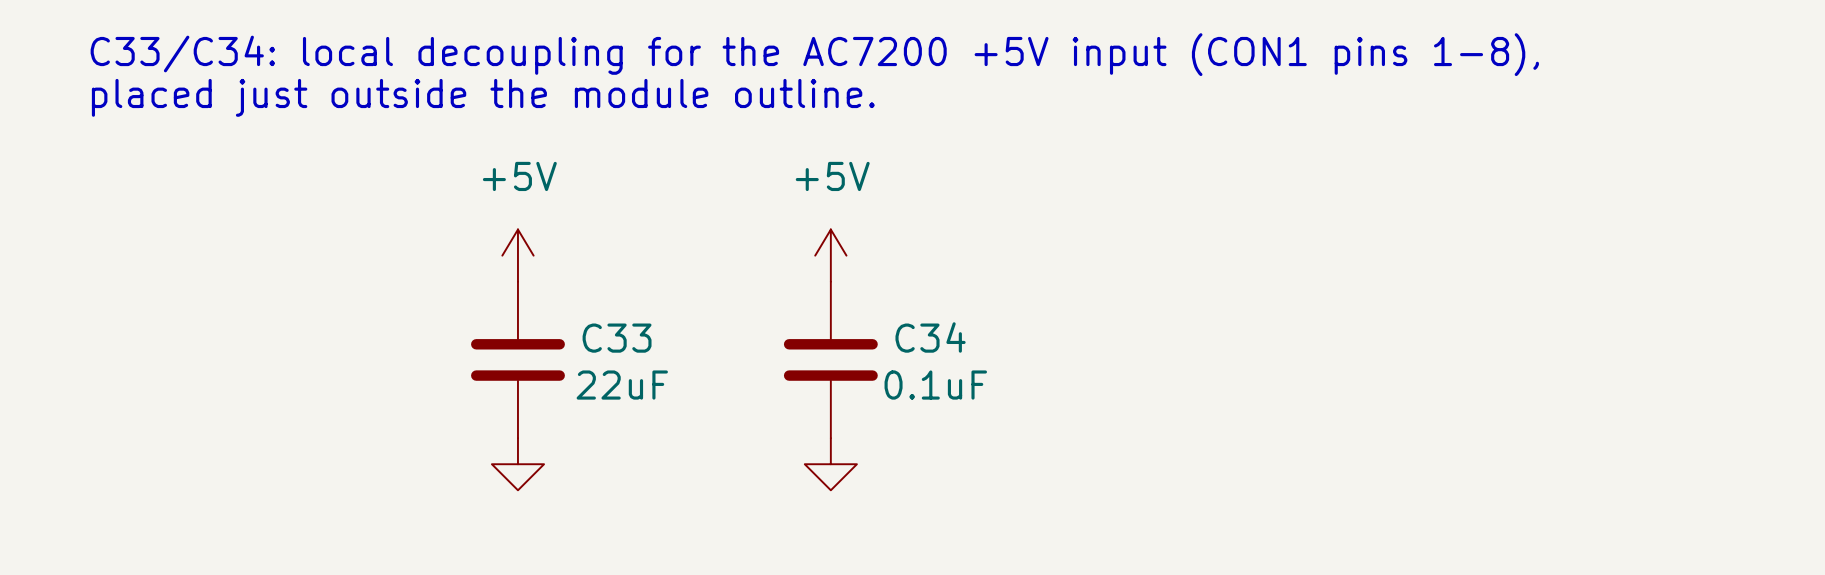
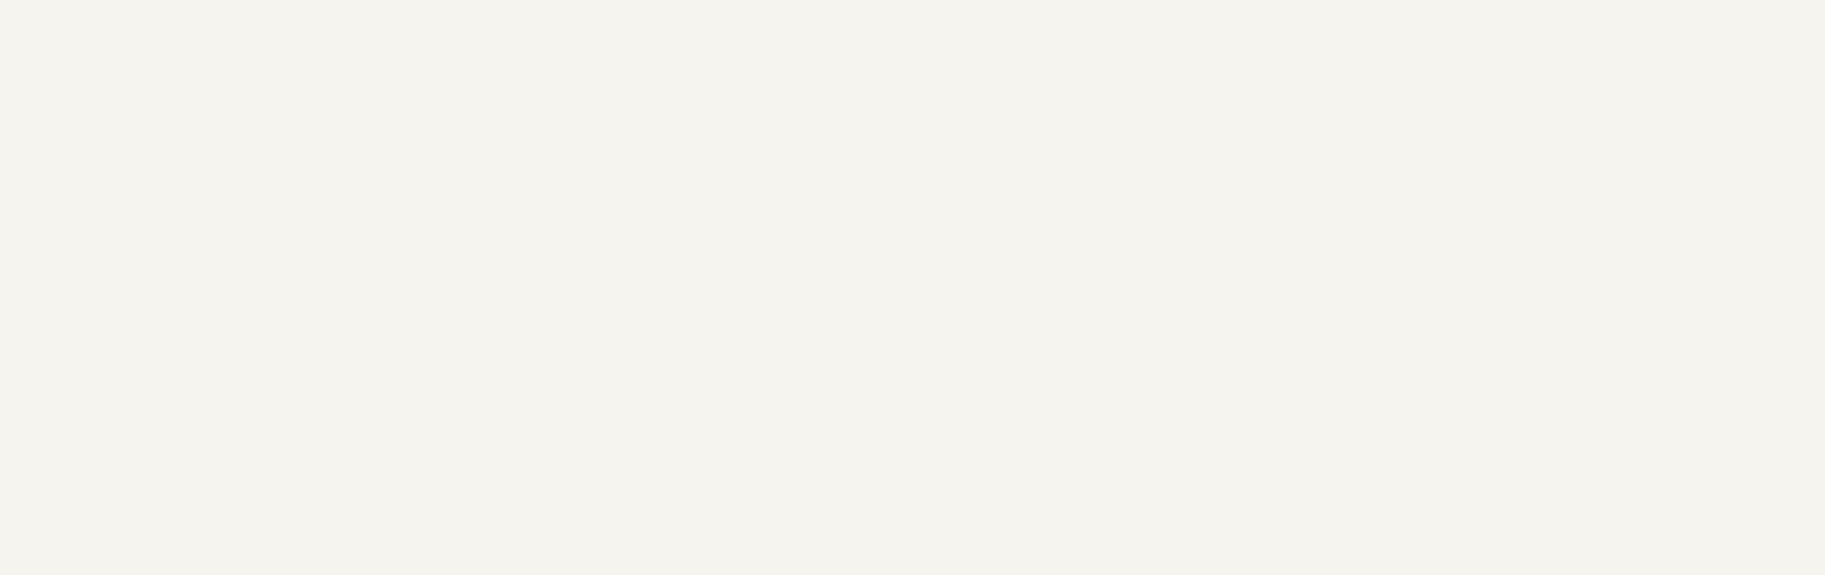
text: C33/C34: local decoupling for the AC7200 +5V input (CON1 pins 1-8), (814, 54) -> none
text: placed just outside the module outline. (483, 97) -> none
power symbol: +5V (517, 255) -> none
power symbol: +5V (830, 255) -> none
C33: 22uF (517, 359) -> none
C34: 0.1uF (830, 359) -> none
power symbol: (517, 464) -> none
power symbol: (830, 464) -> none

